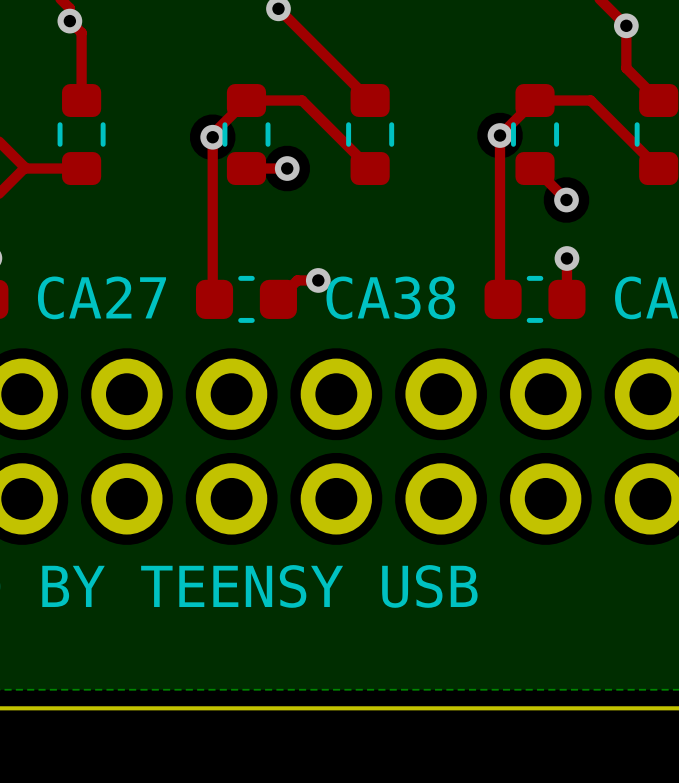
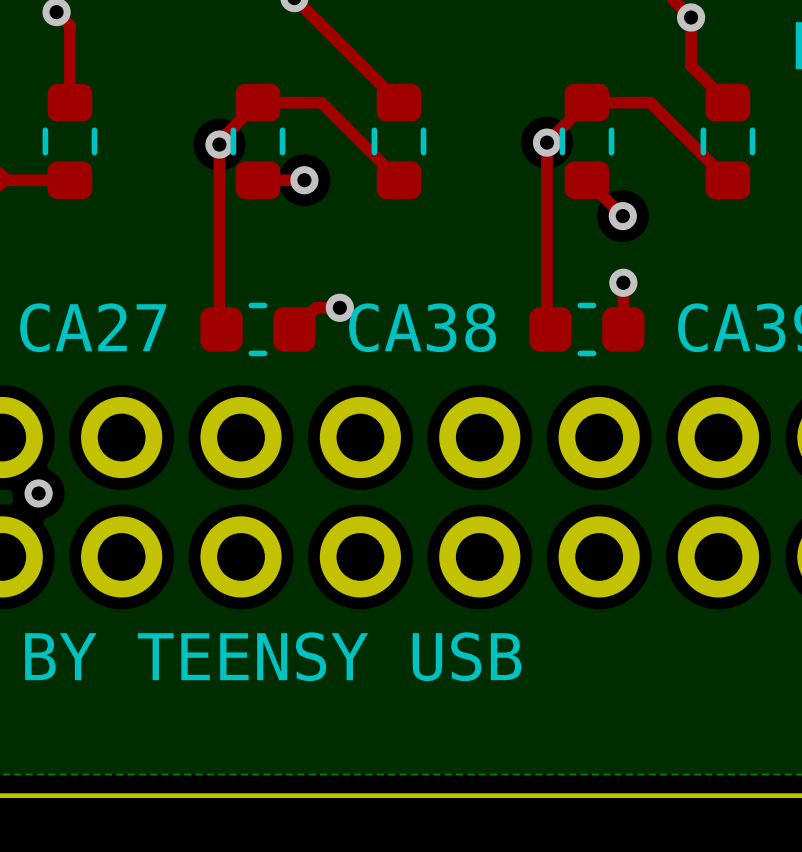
via: none -> (38, 493)

